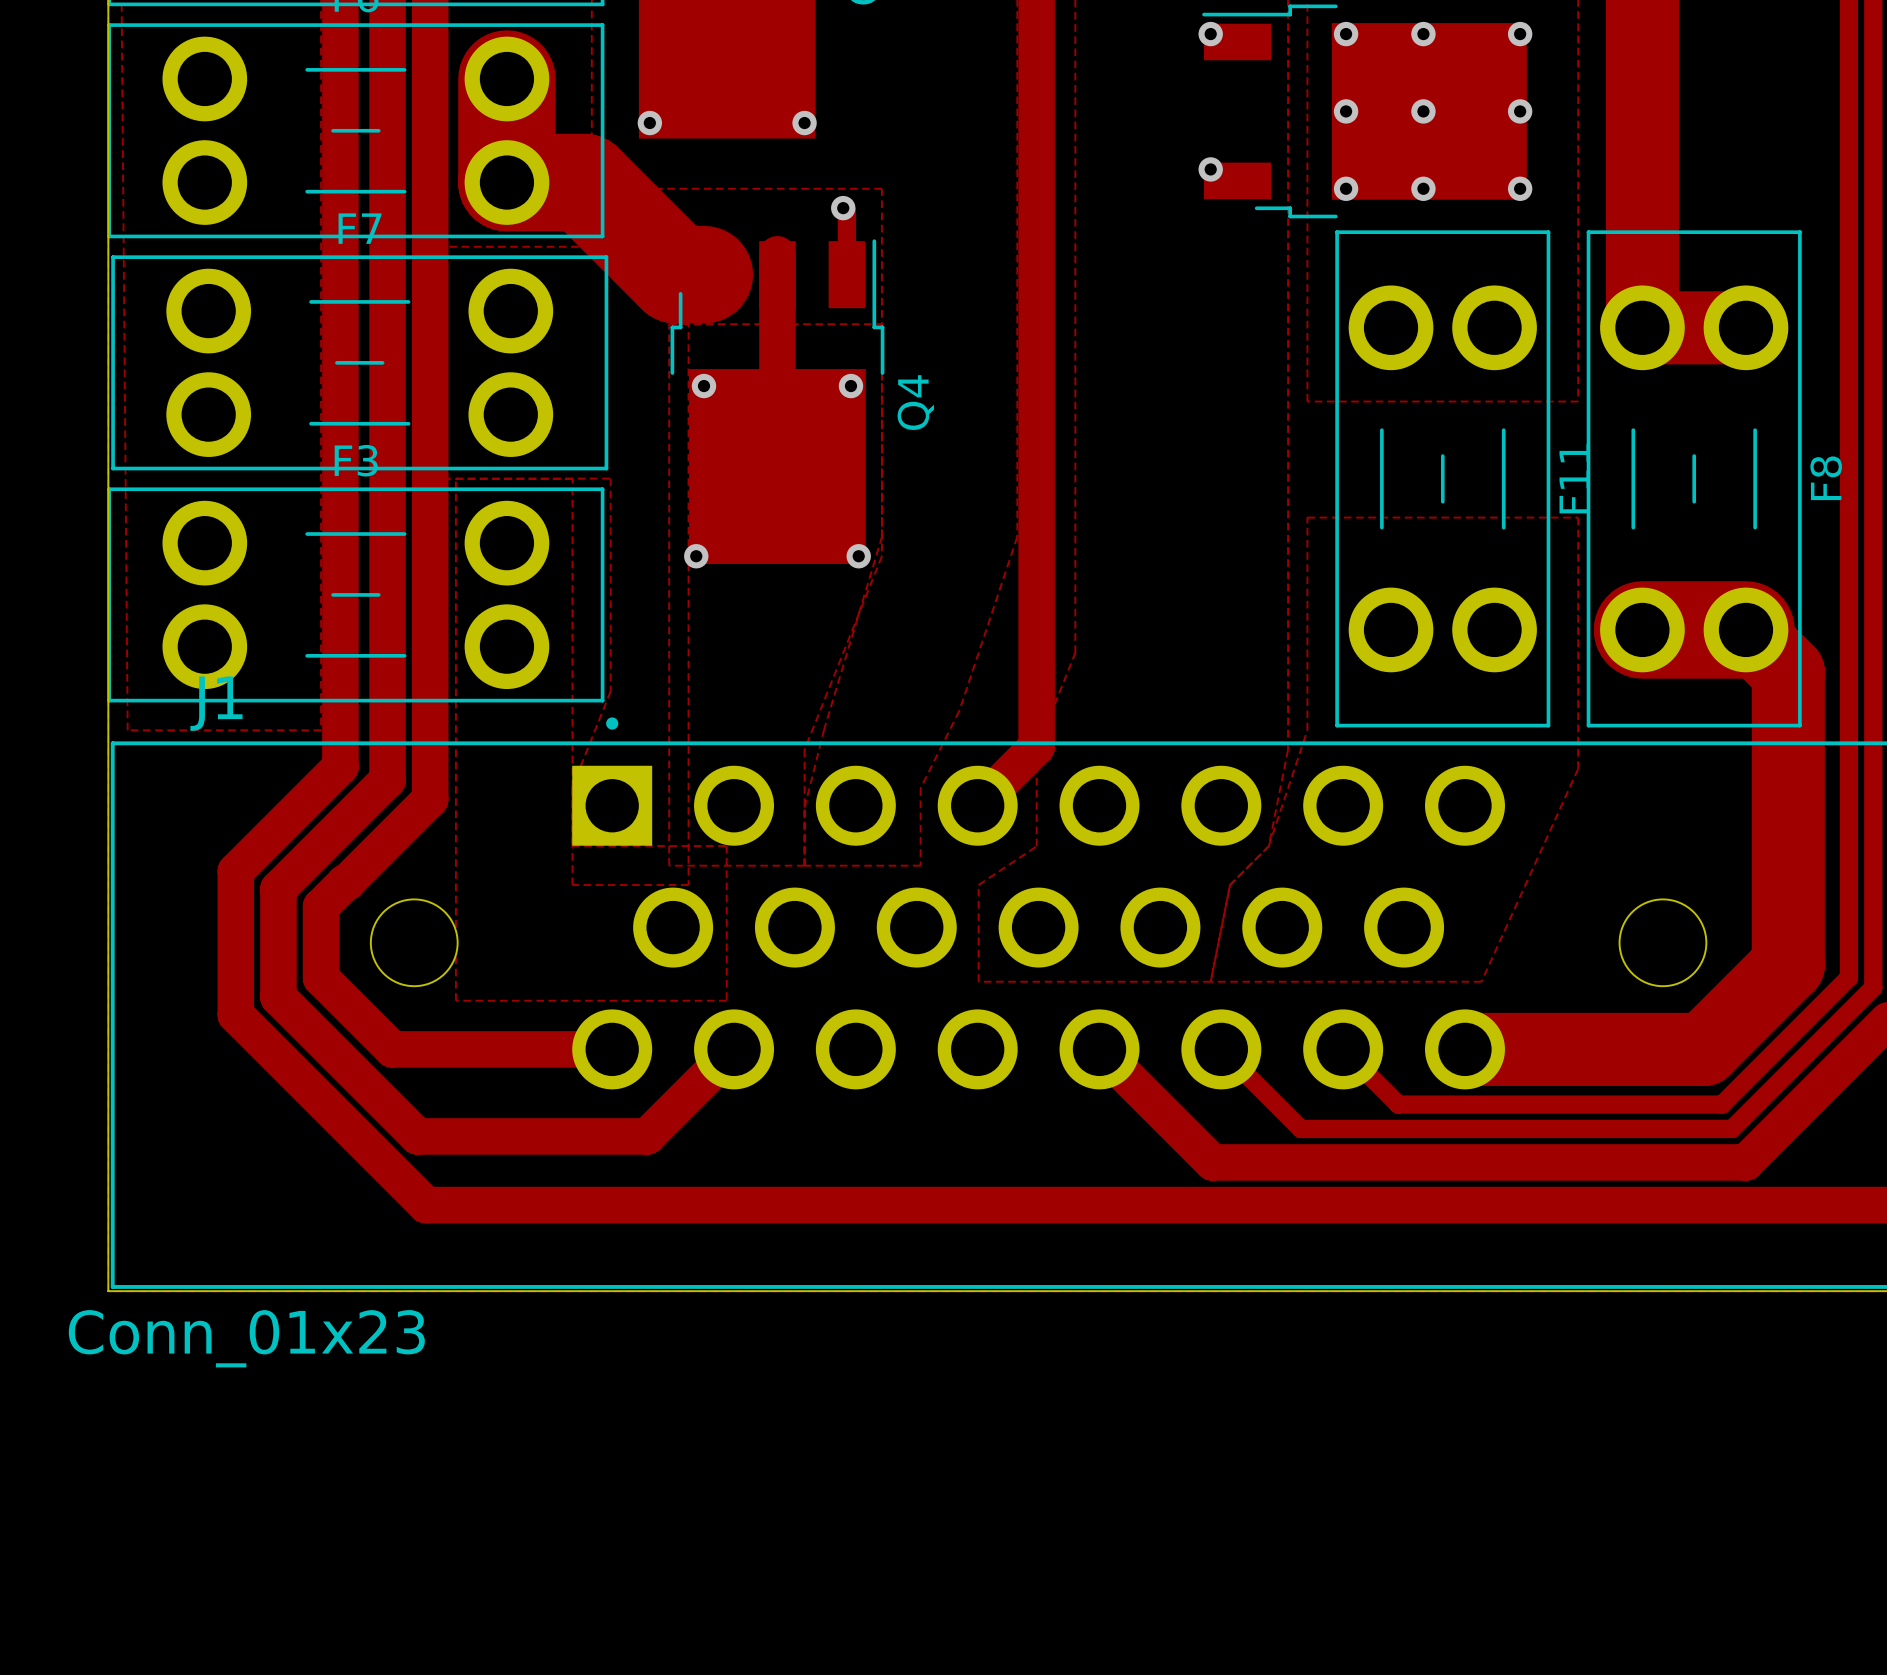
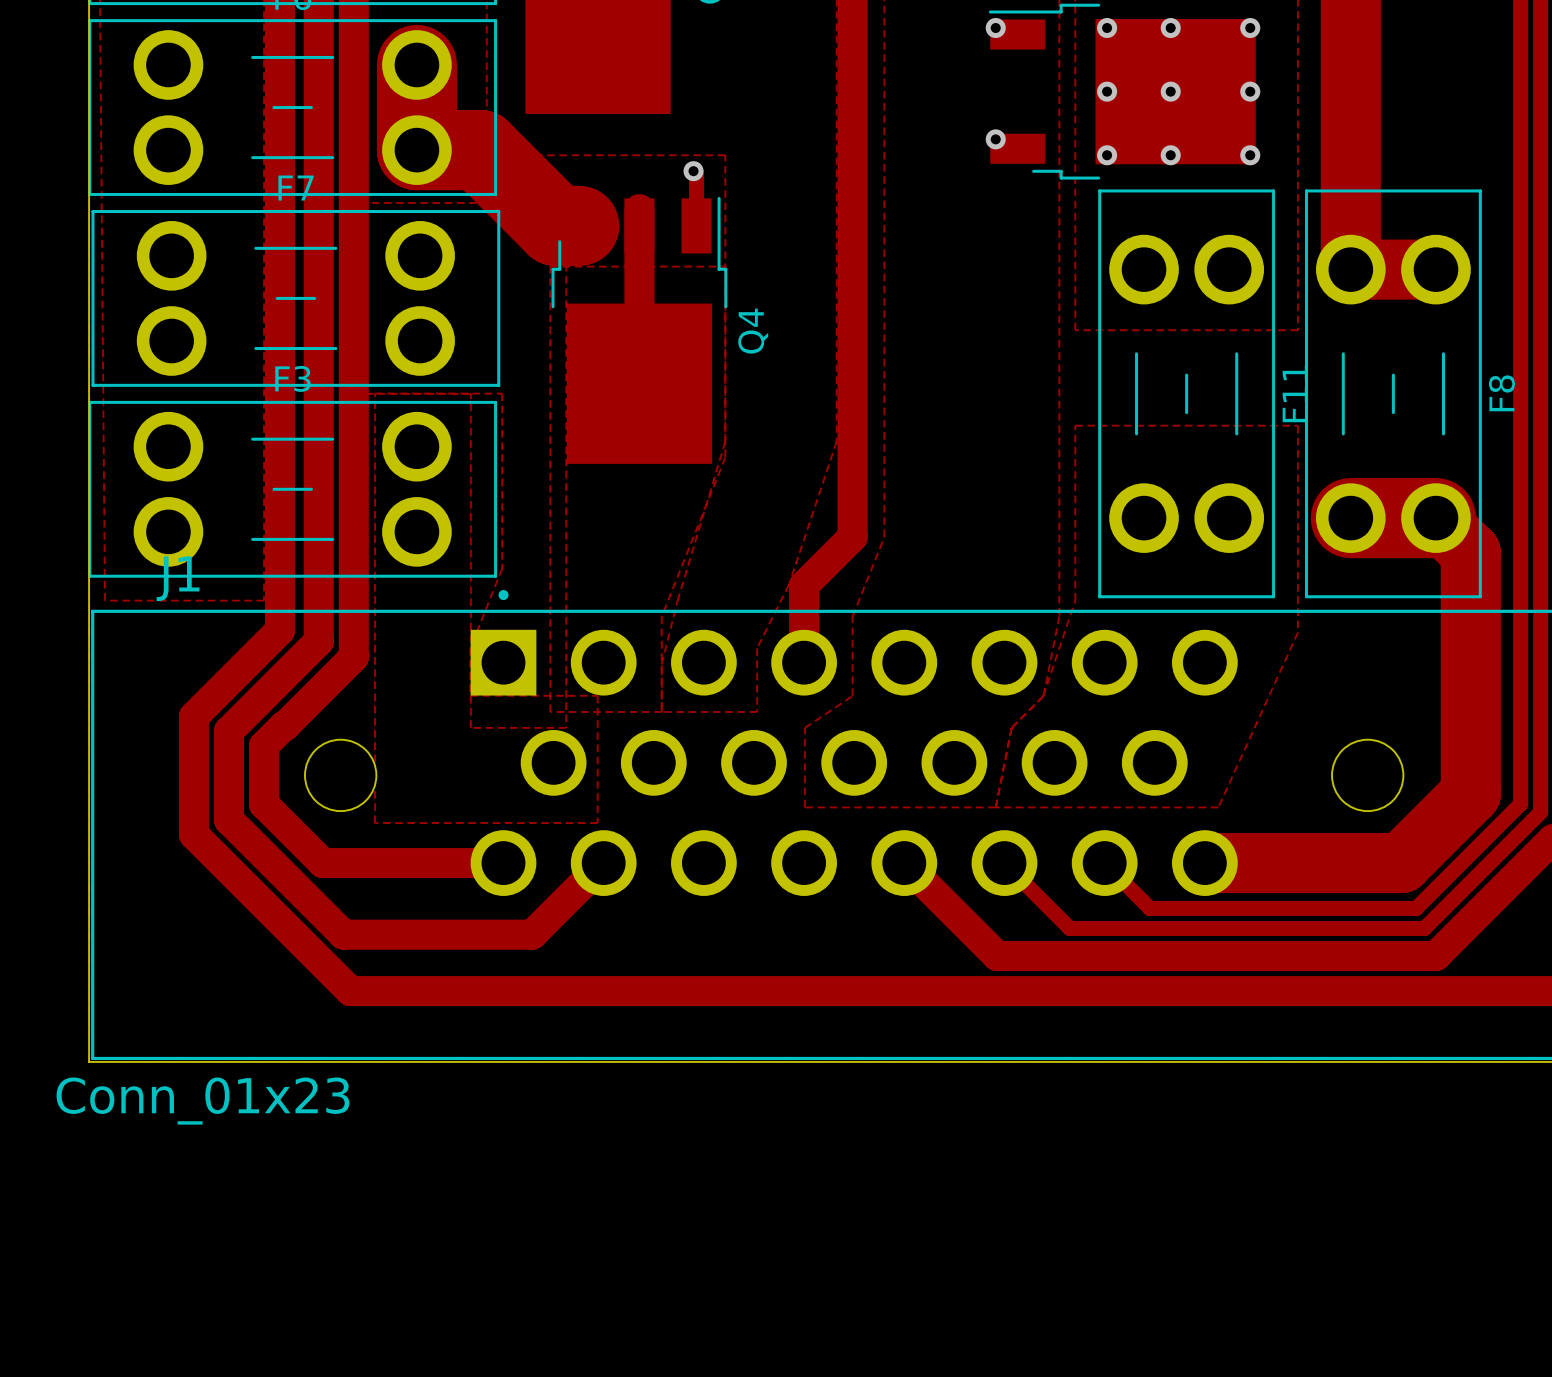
via: (649, 123) -> none
via: (804, 123) -> none
via: (704, 386) -> none
via: (850, 386) -> none
via: (696, 556) -> none
via: (858, 556) -> none
track: (1036, 652) (1036, 746) (977, 805) -> (852, 537) (804, 585) (804, 662)

